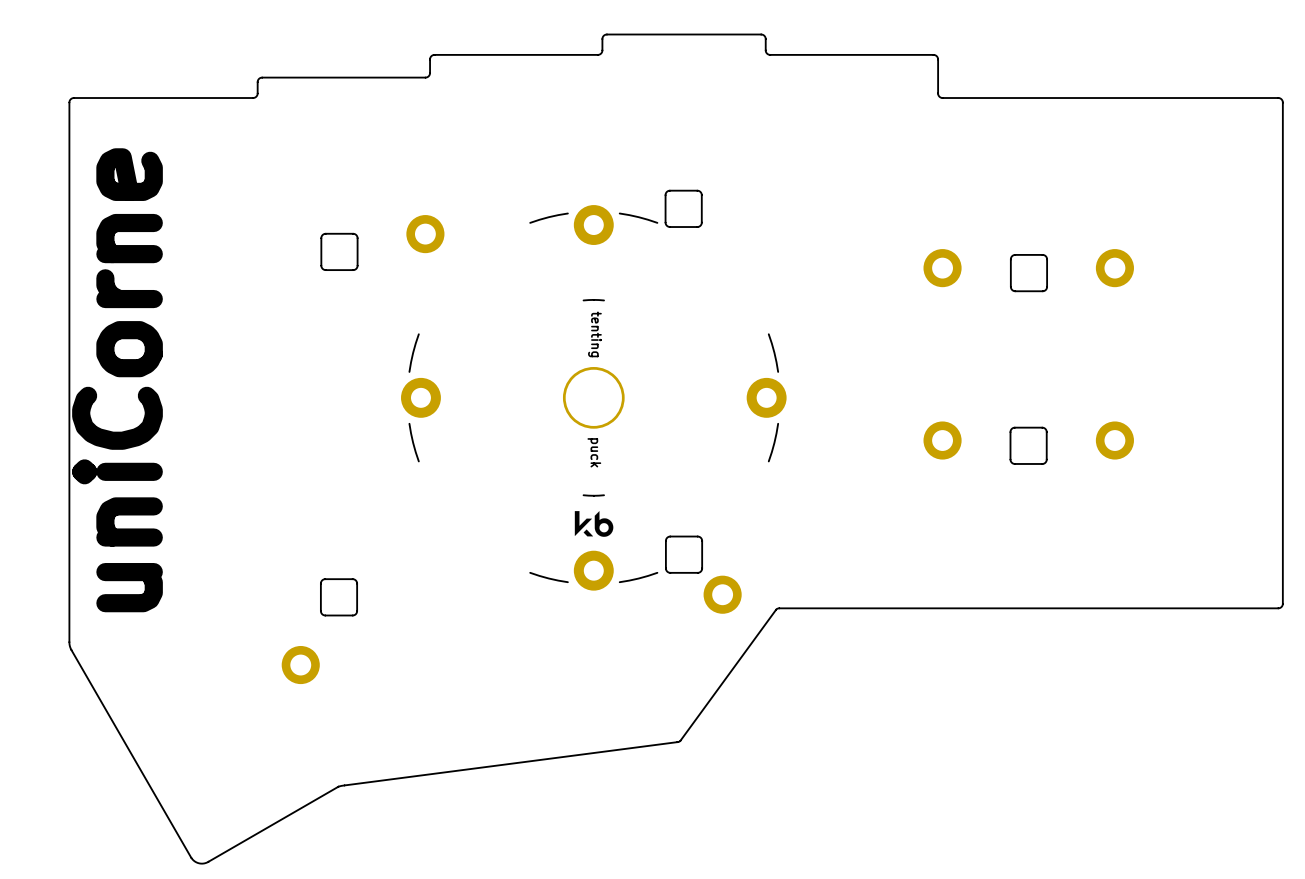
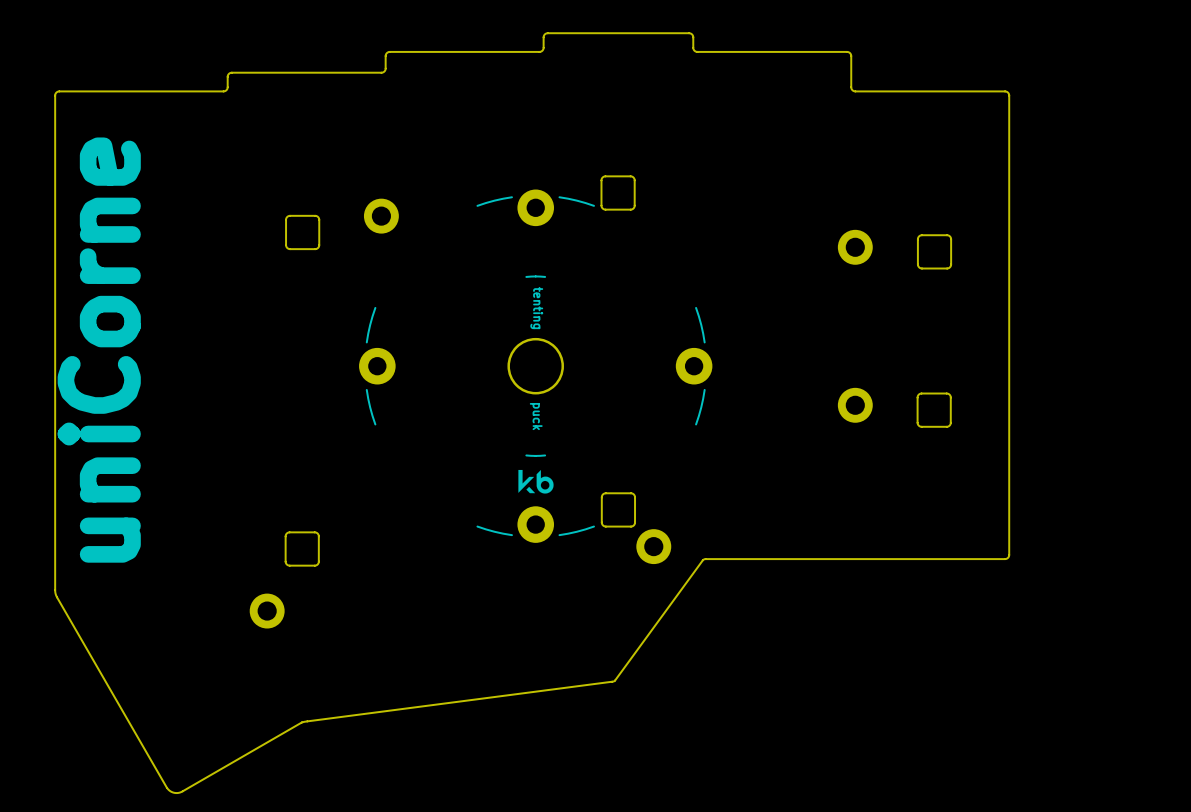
board edge: (1105, 98) (1278, 98) (1282, 102) (1282, 605) (1278, 608) (1105, 608) -> (1005, 91) (1009, 95) (1009, 554) (1005, 559)
part: (1114, 268) -> none
part: (1114, 440) -> none

